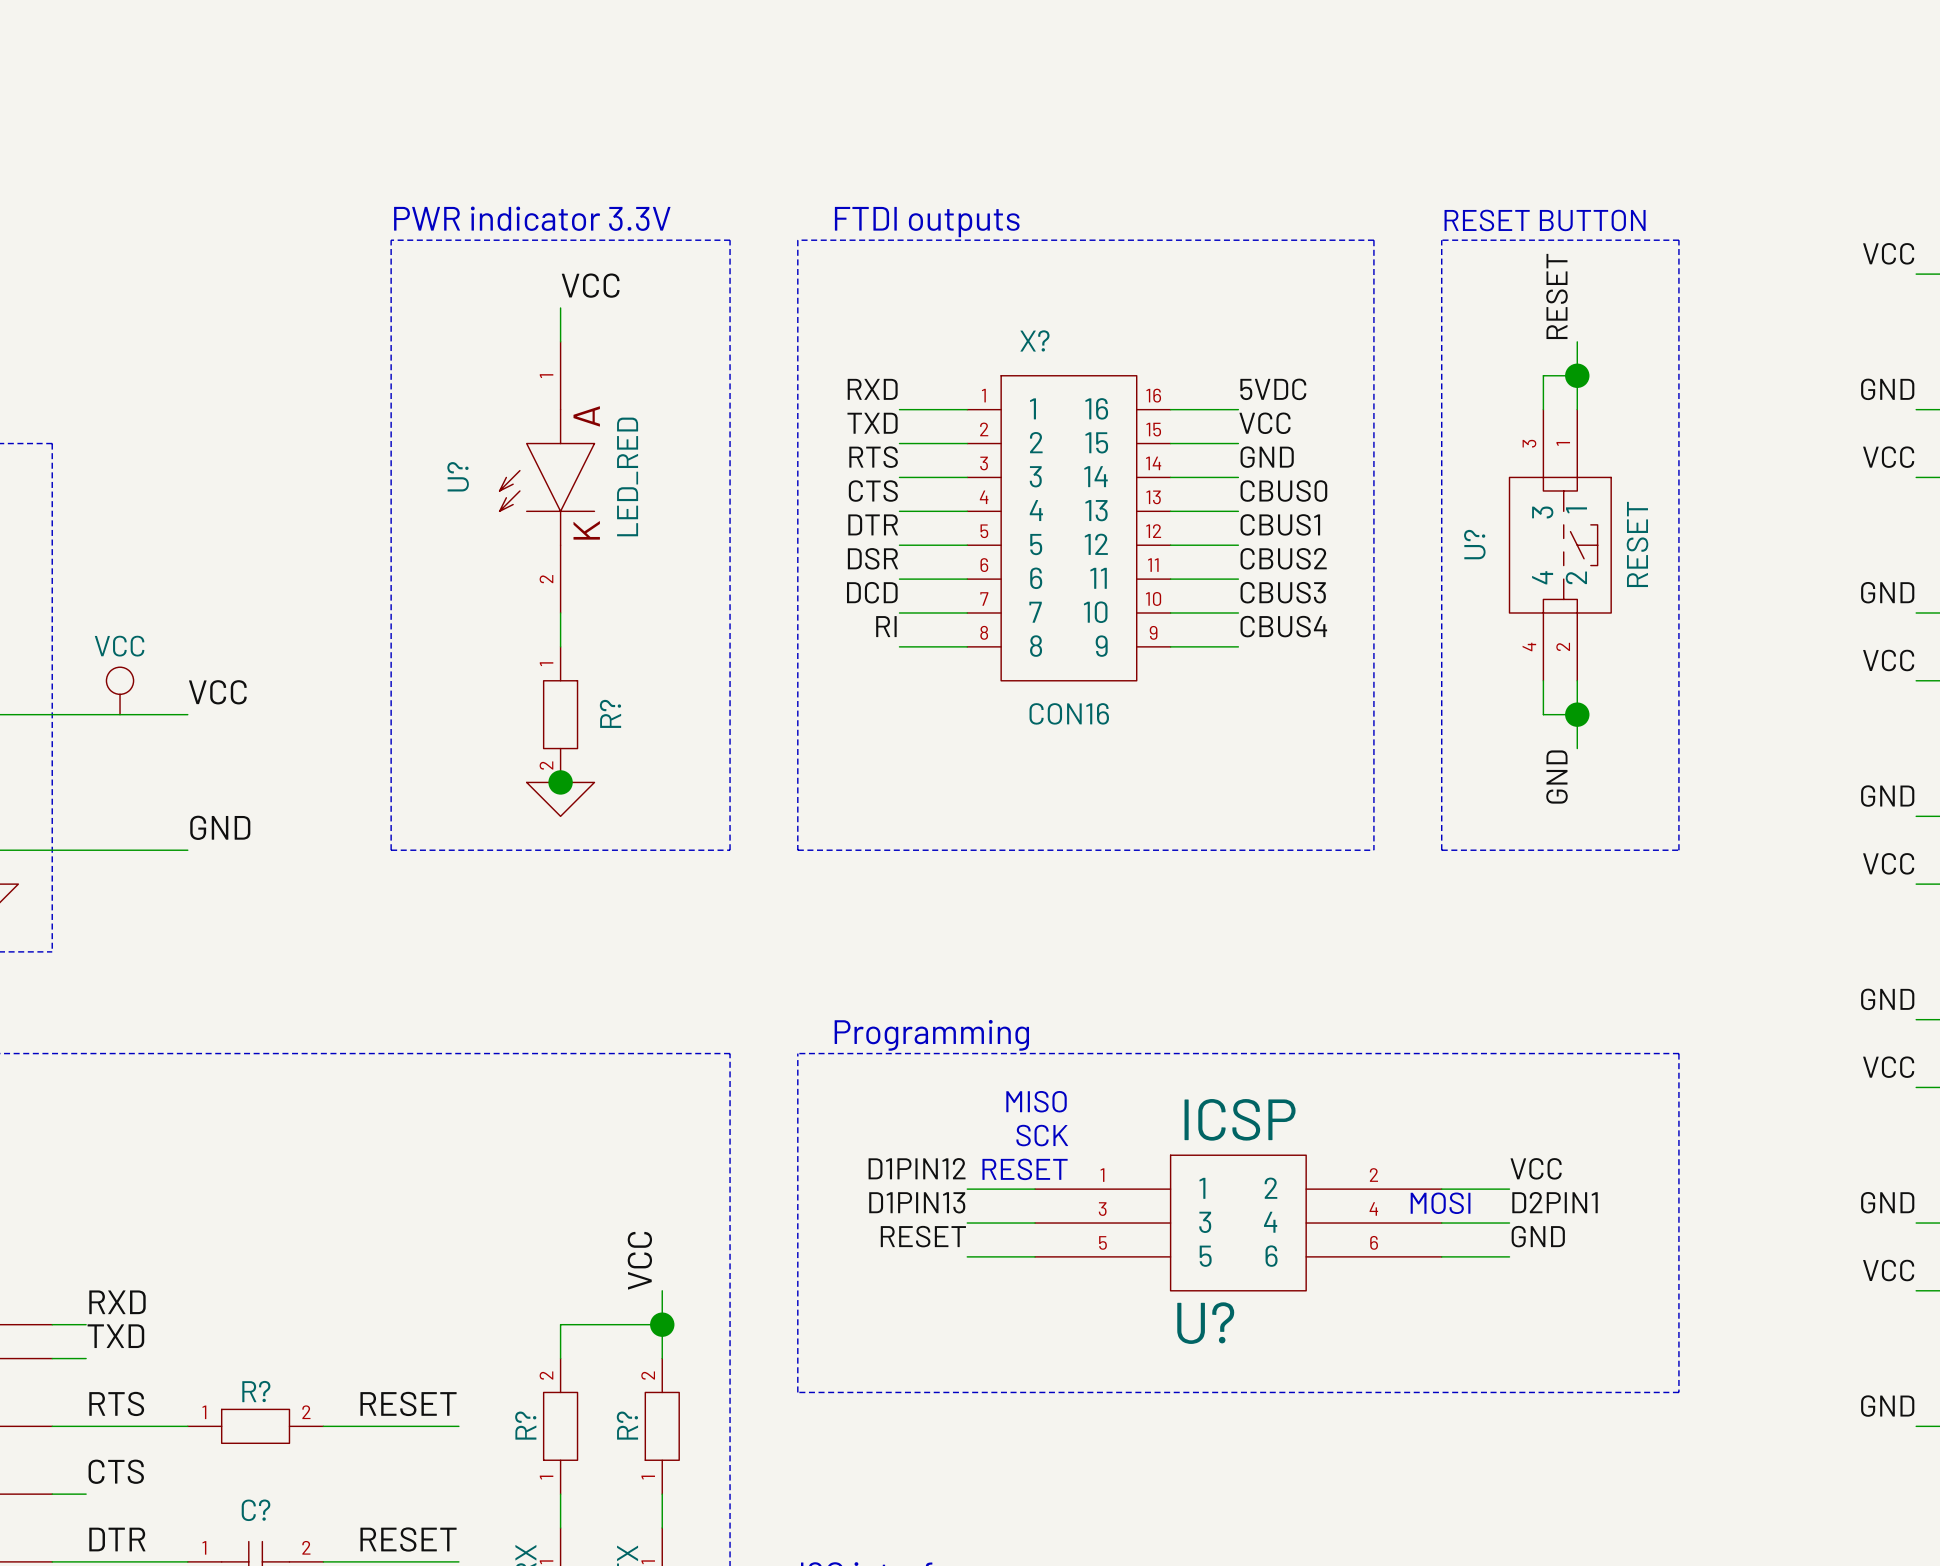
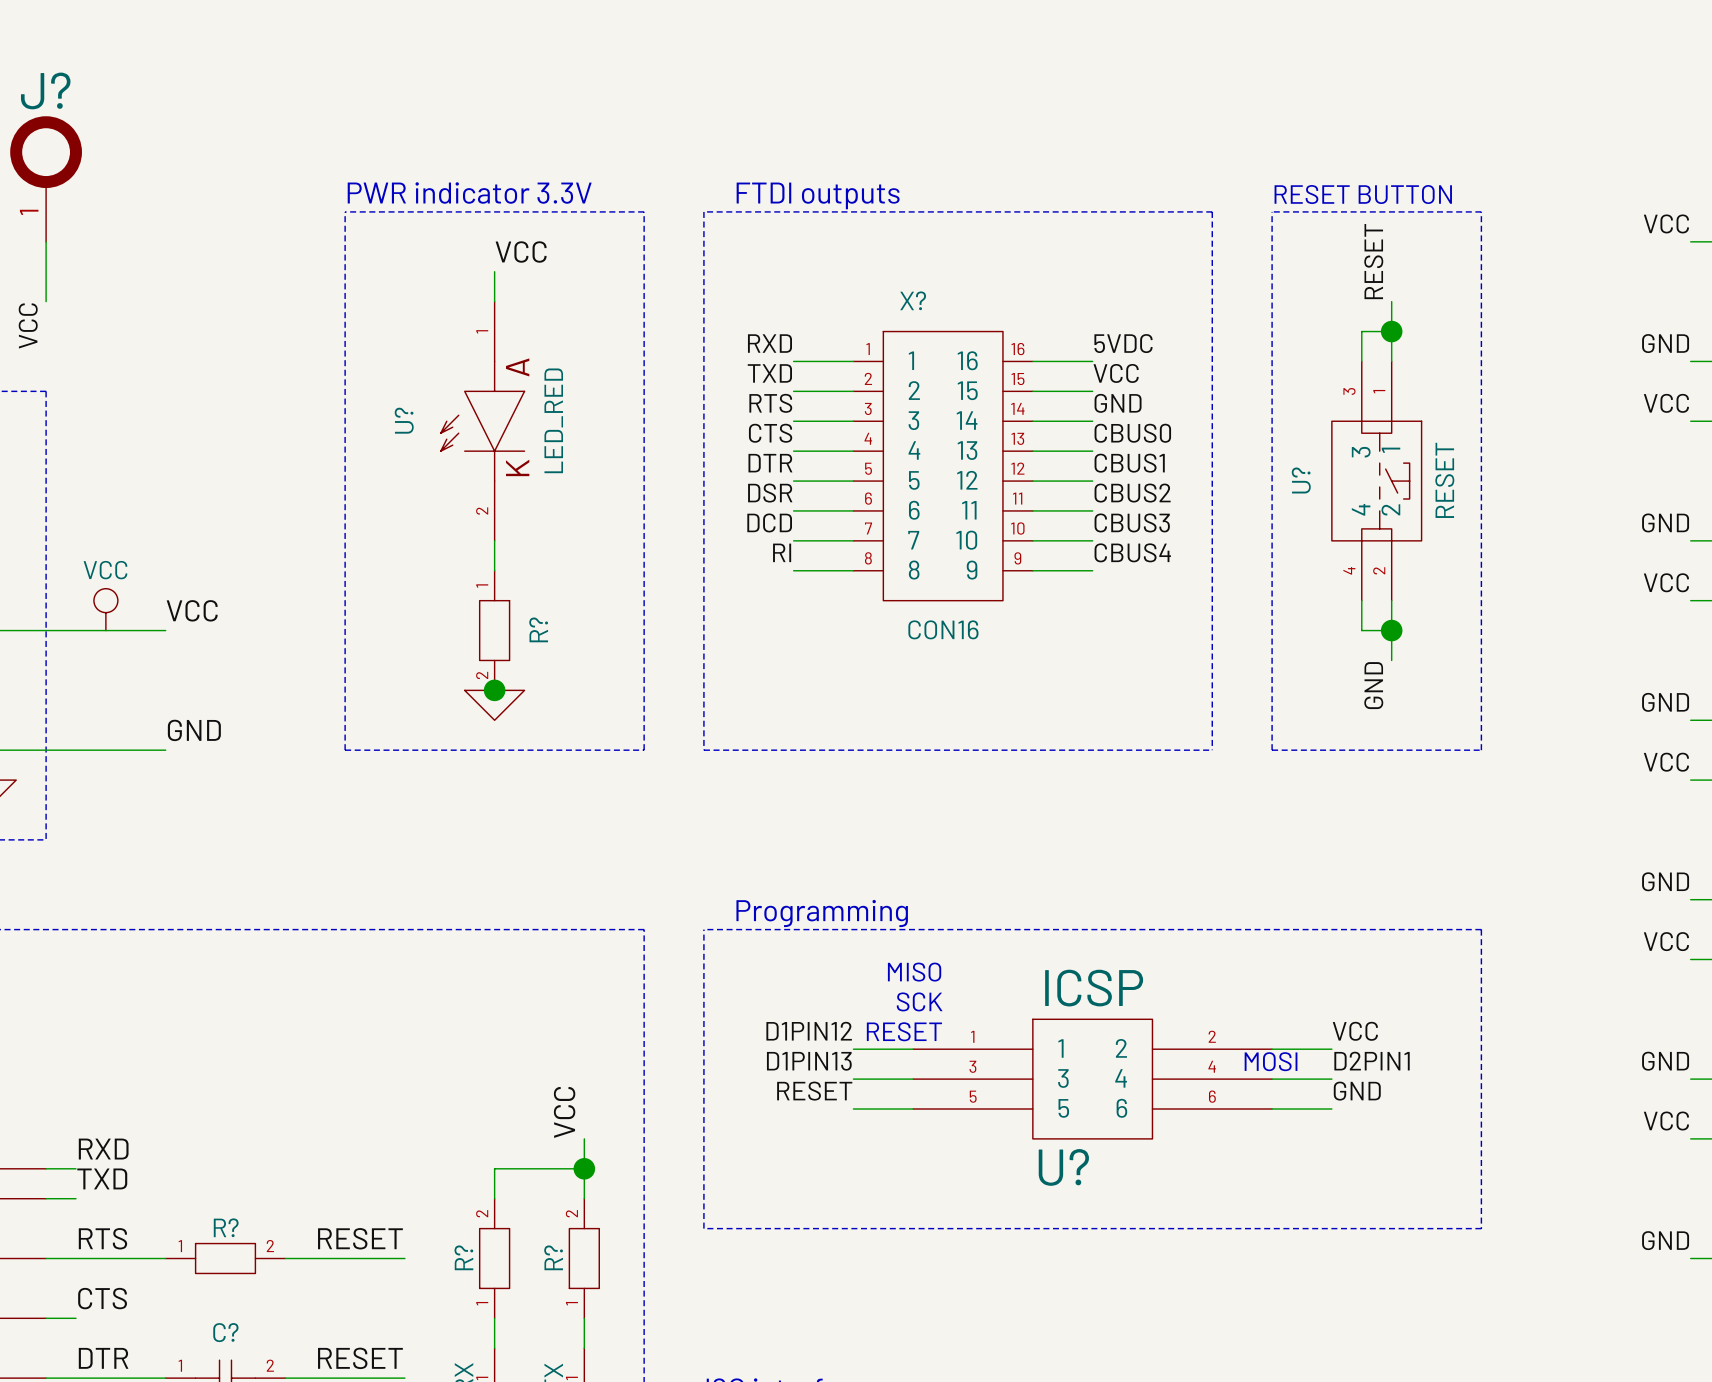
J?: none -> (46, 179)
wire: none -> (46, 241) (46, 301)
label: none -> VCC (28, 325)

